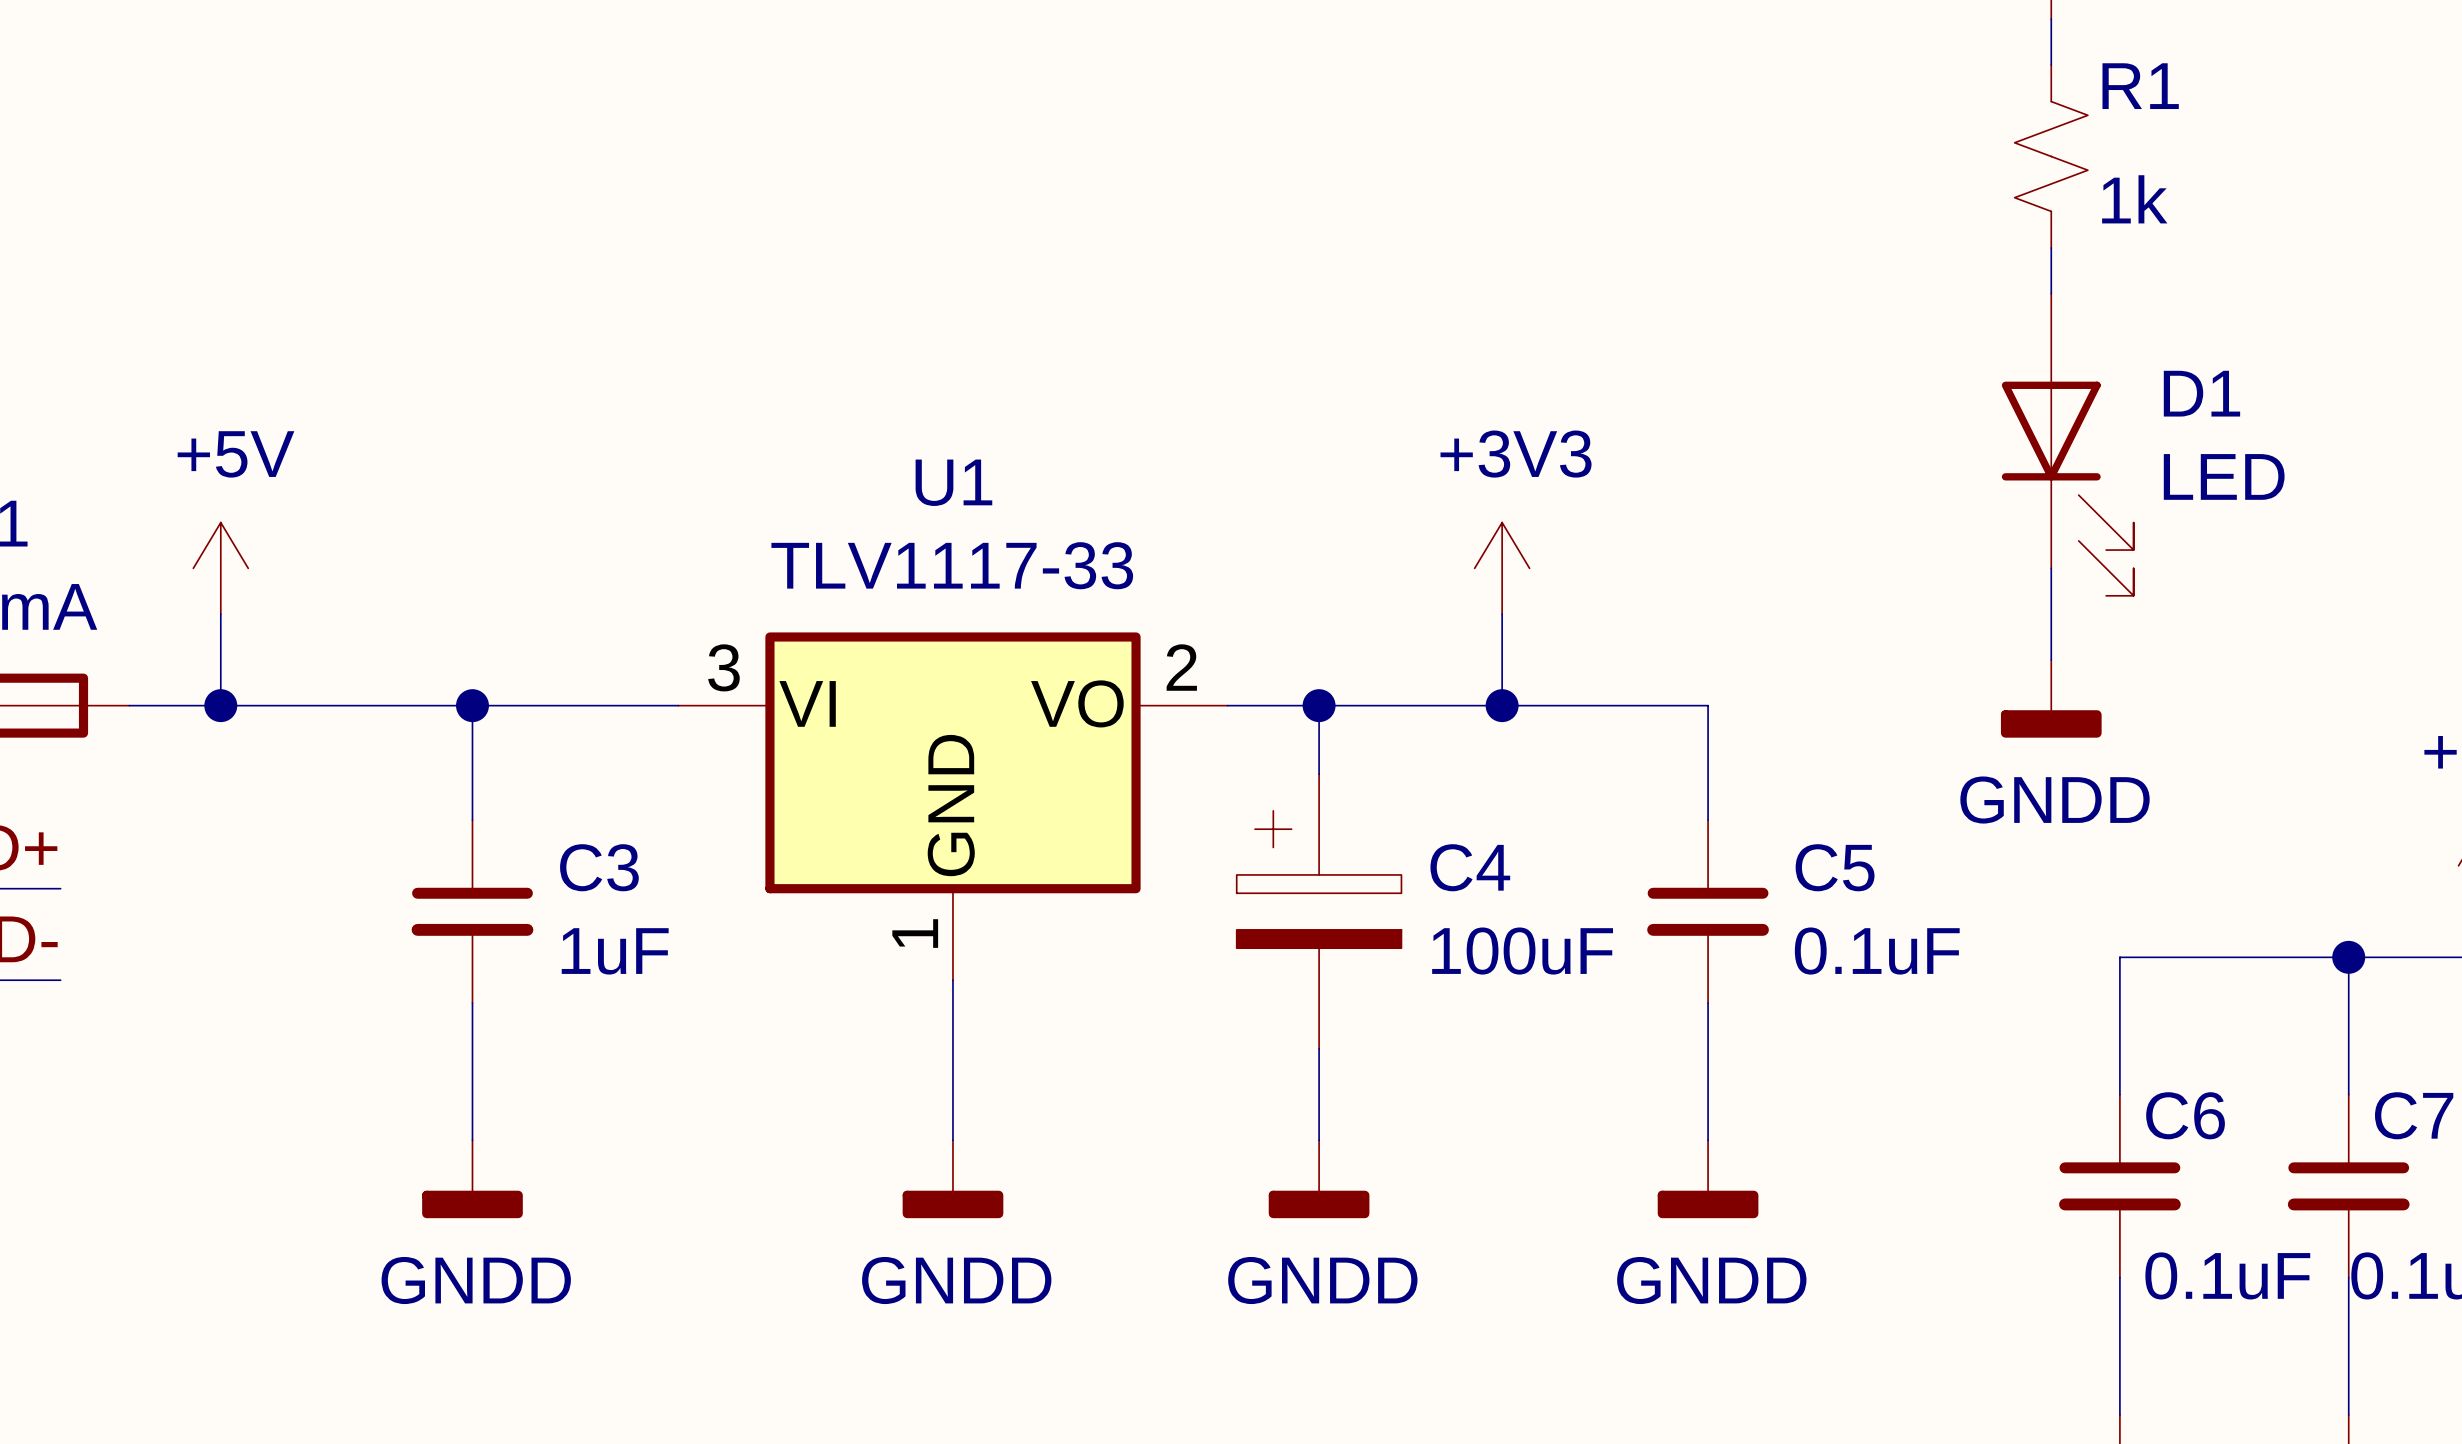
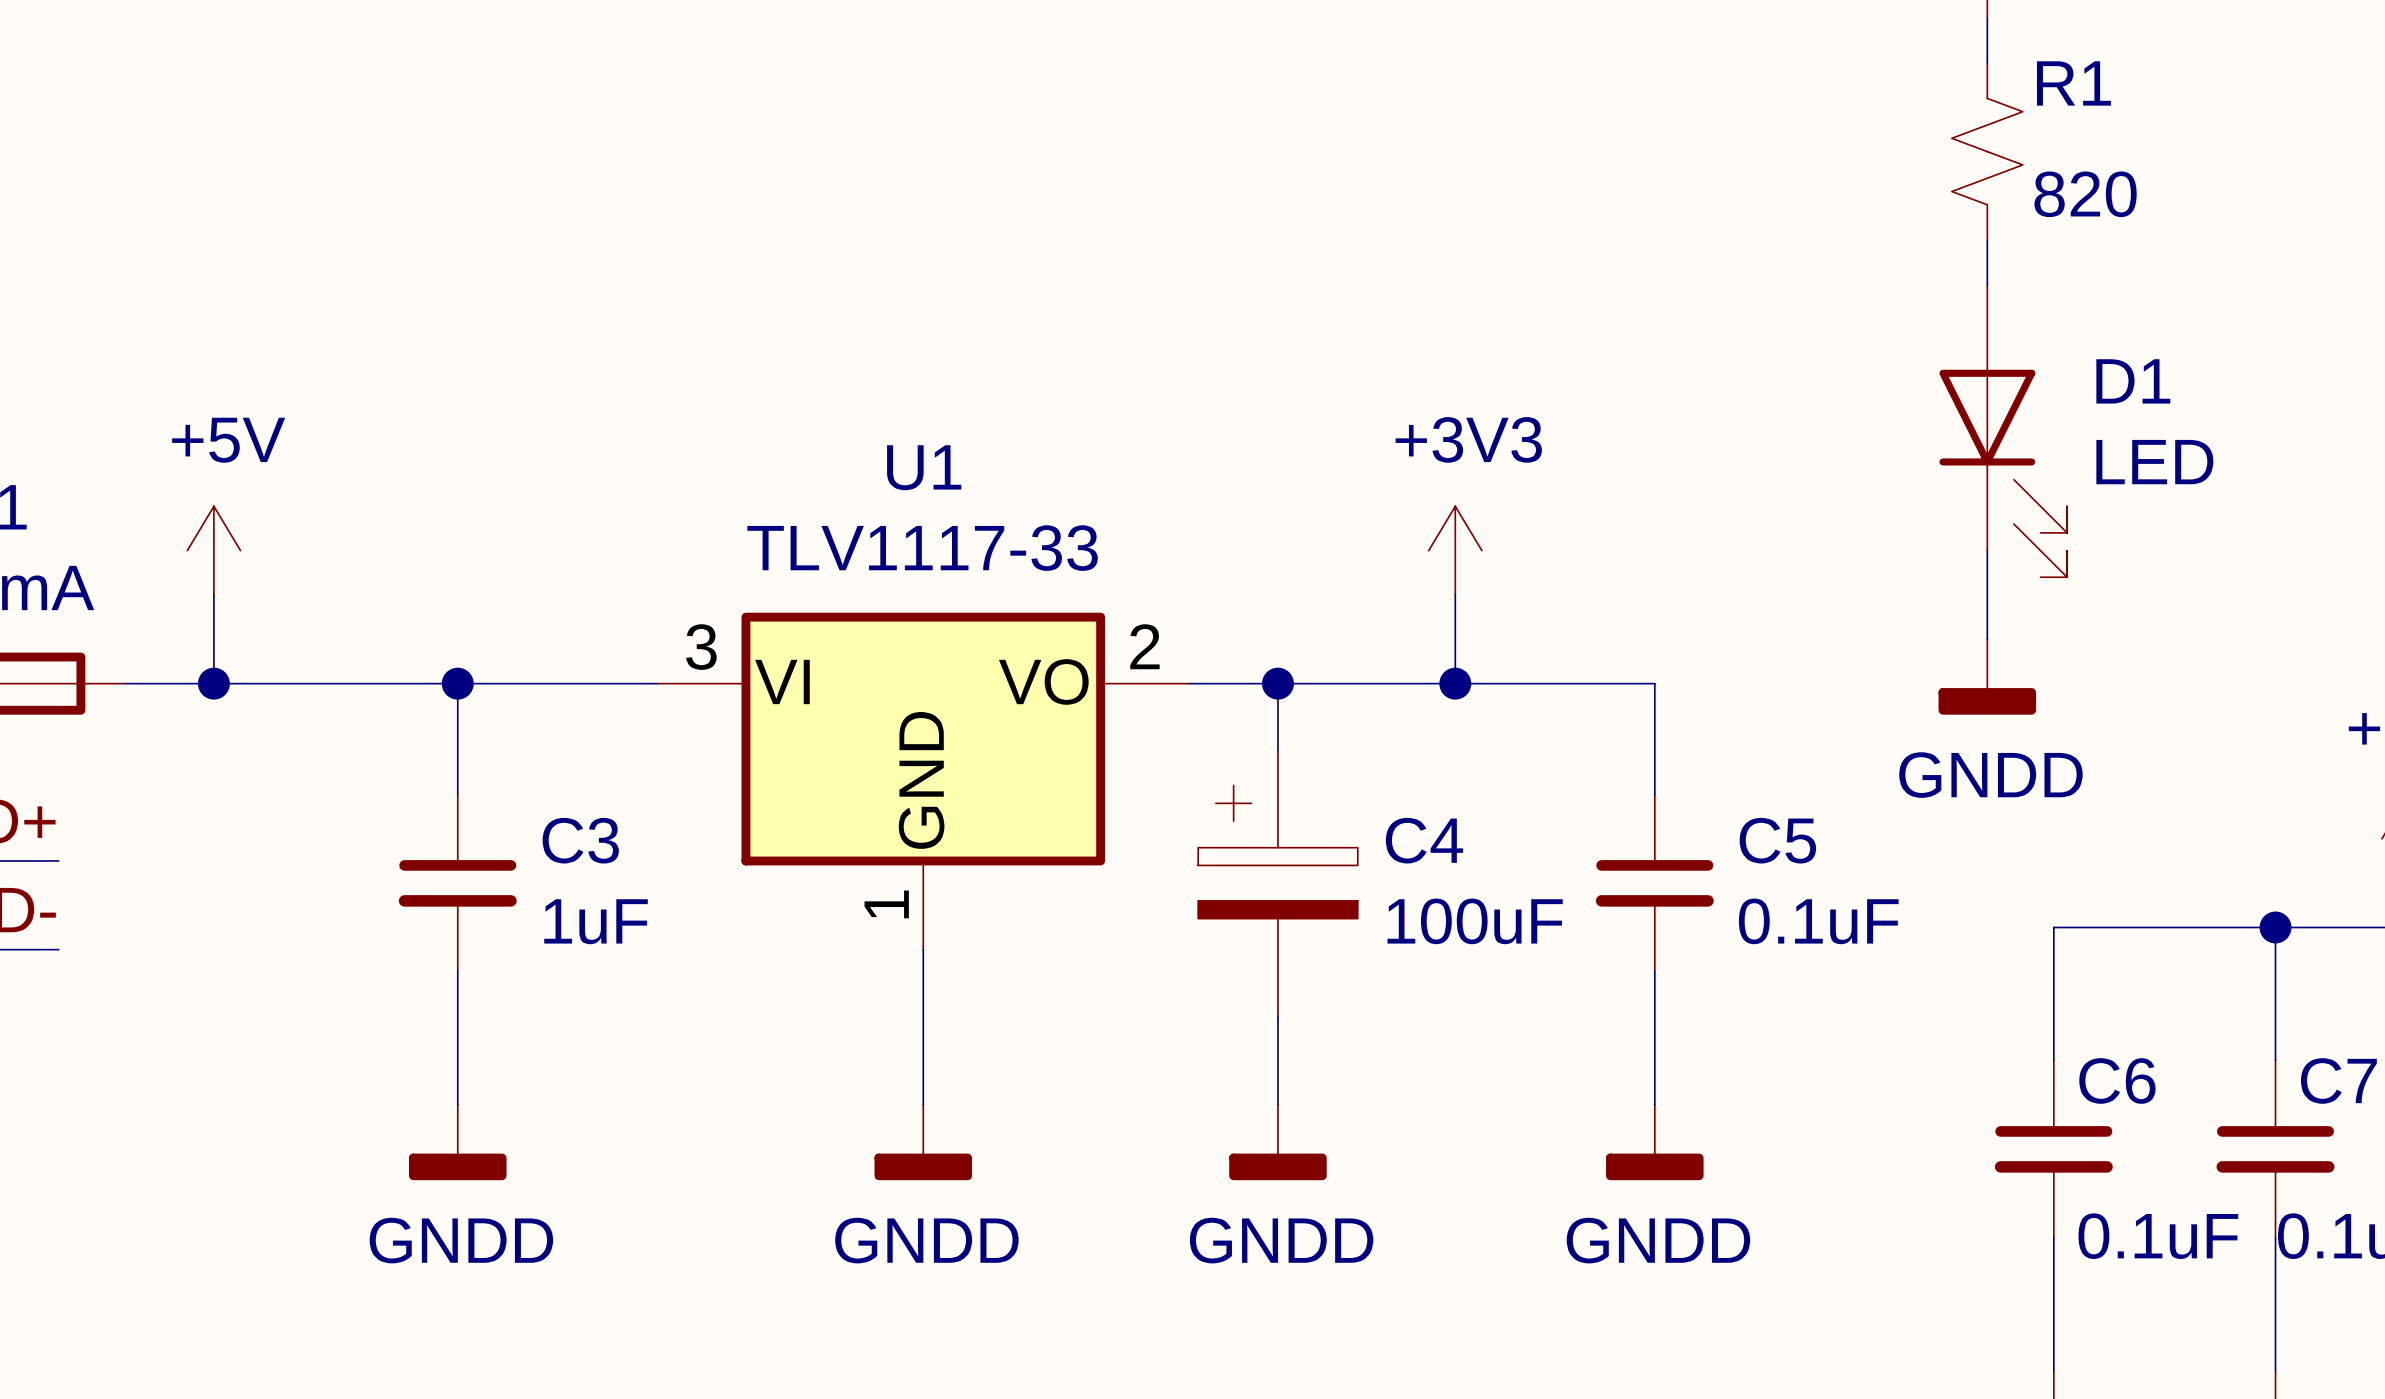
R1 value: 1k (2134, 199) -> 820 (2085, 194)

